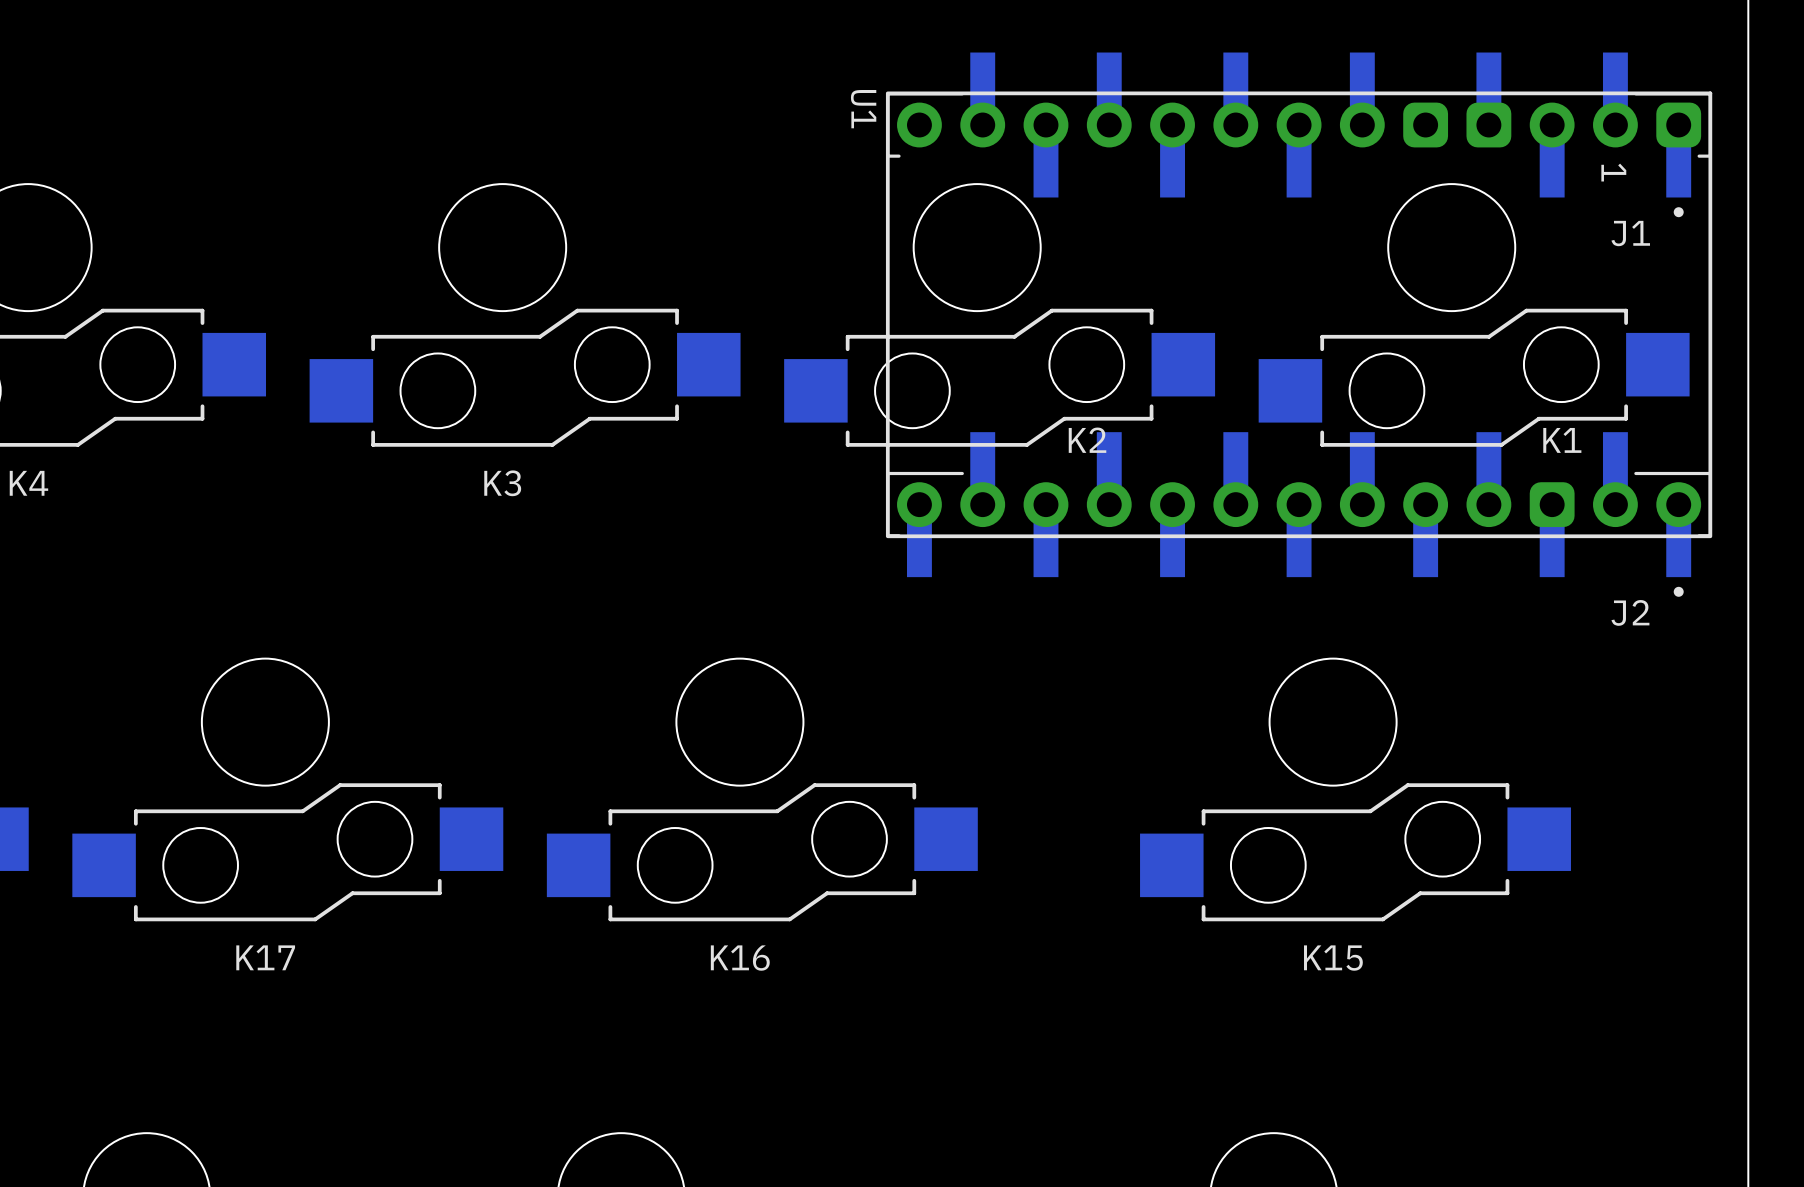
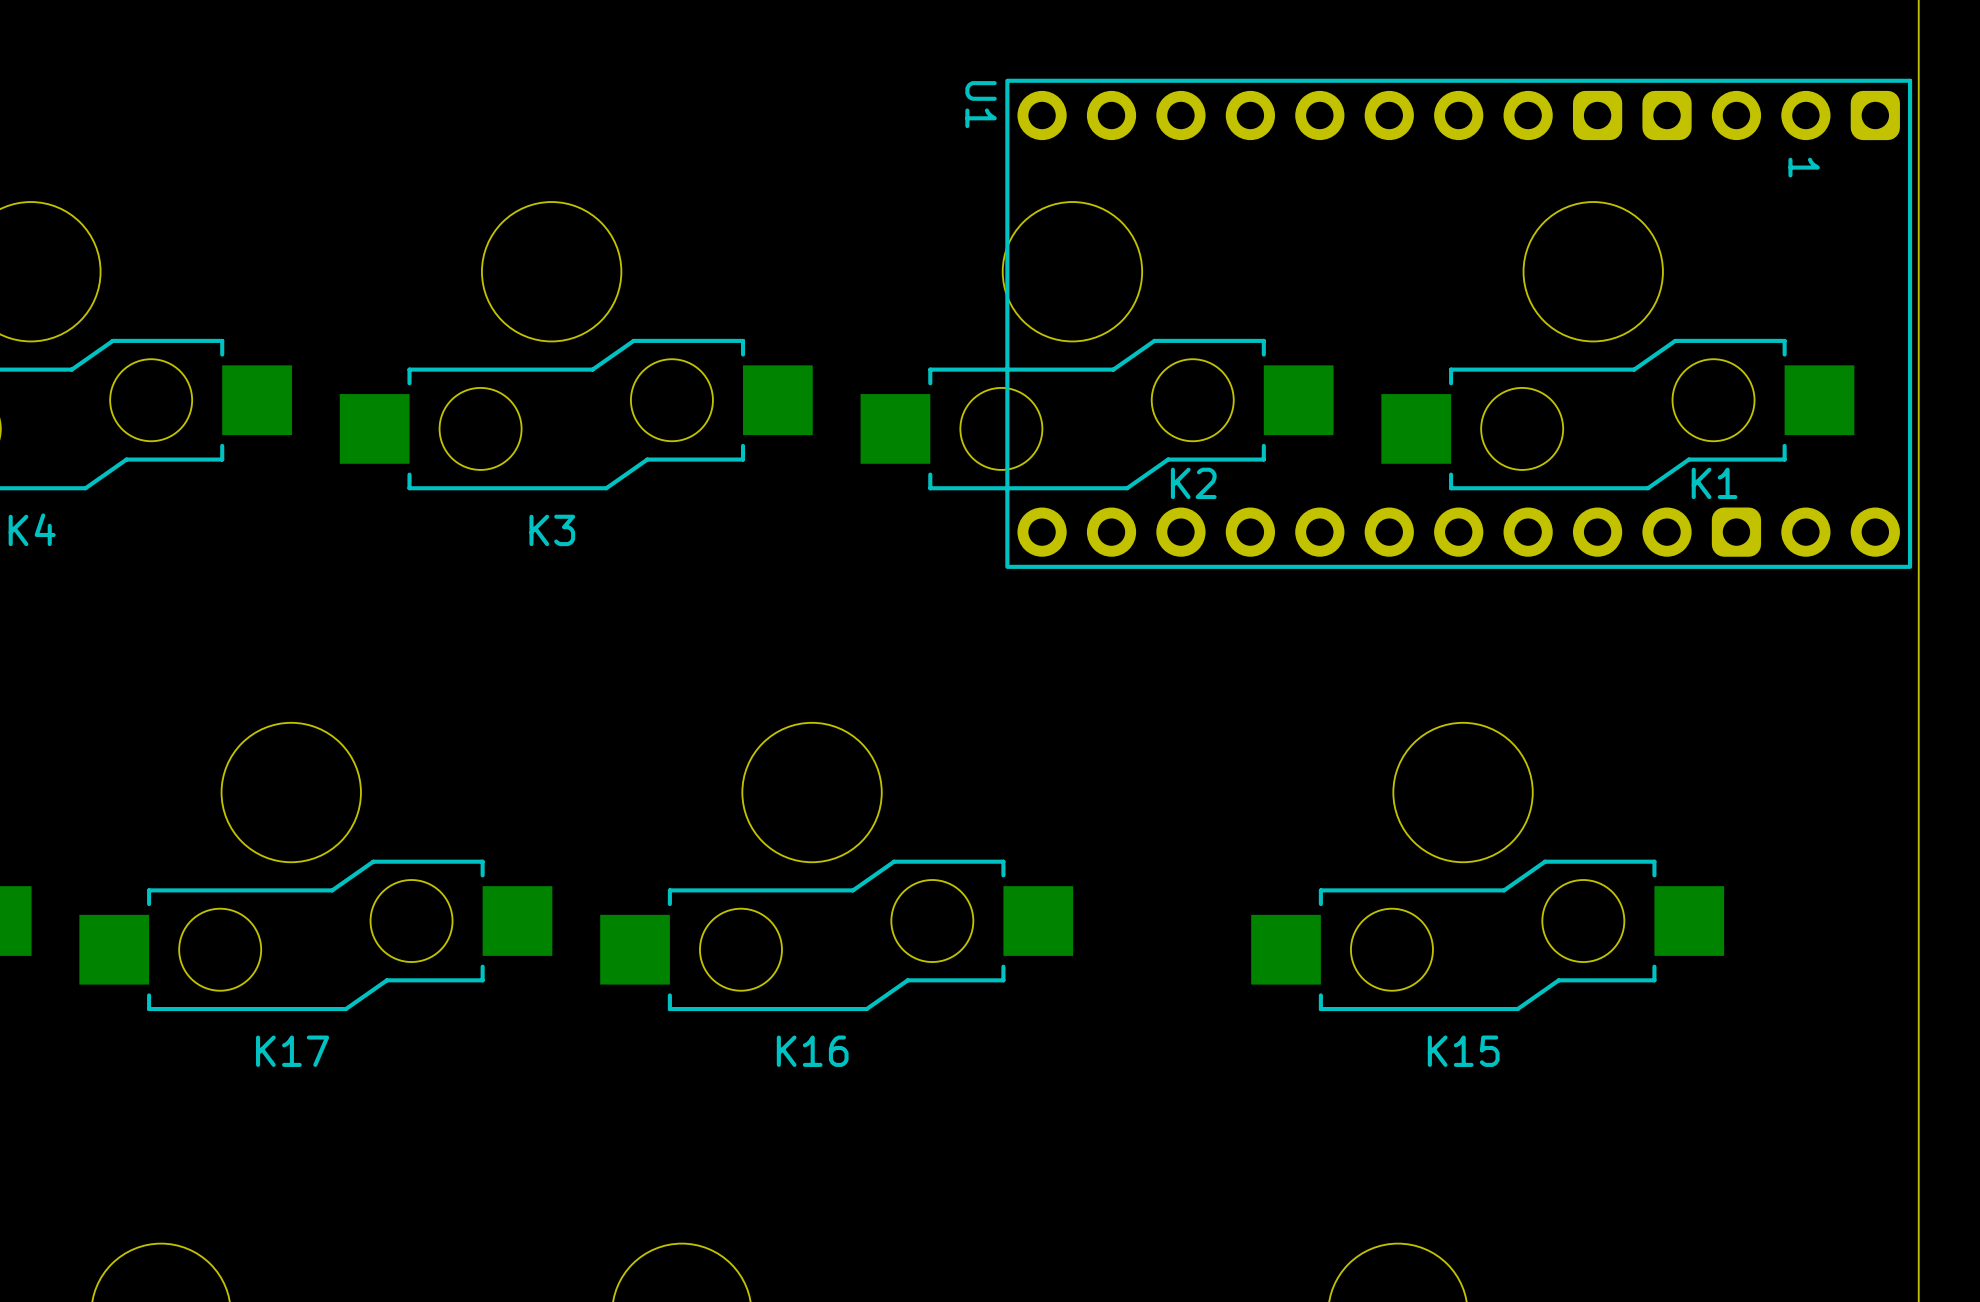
J1: (1299, 134) -> none
U1 position: (1299, 314) -> (1458, 323)
J2: (1299, 514) -> none

